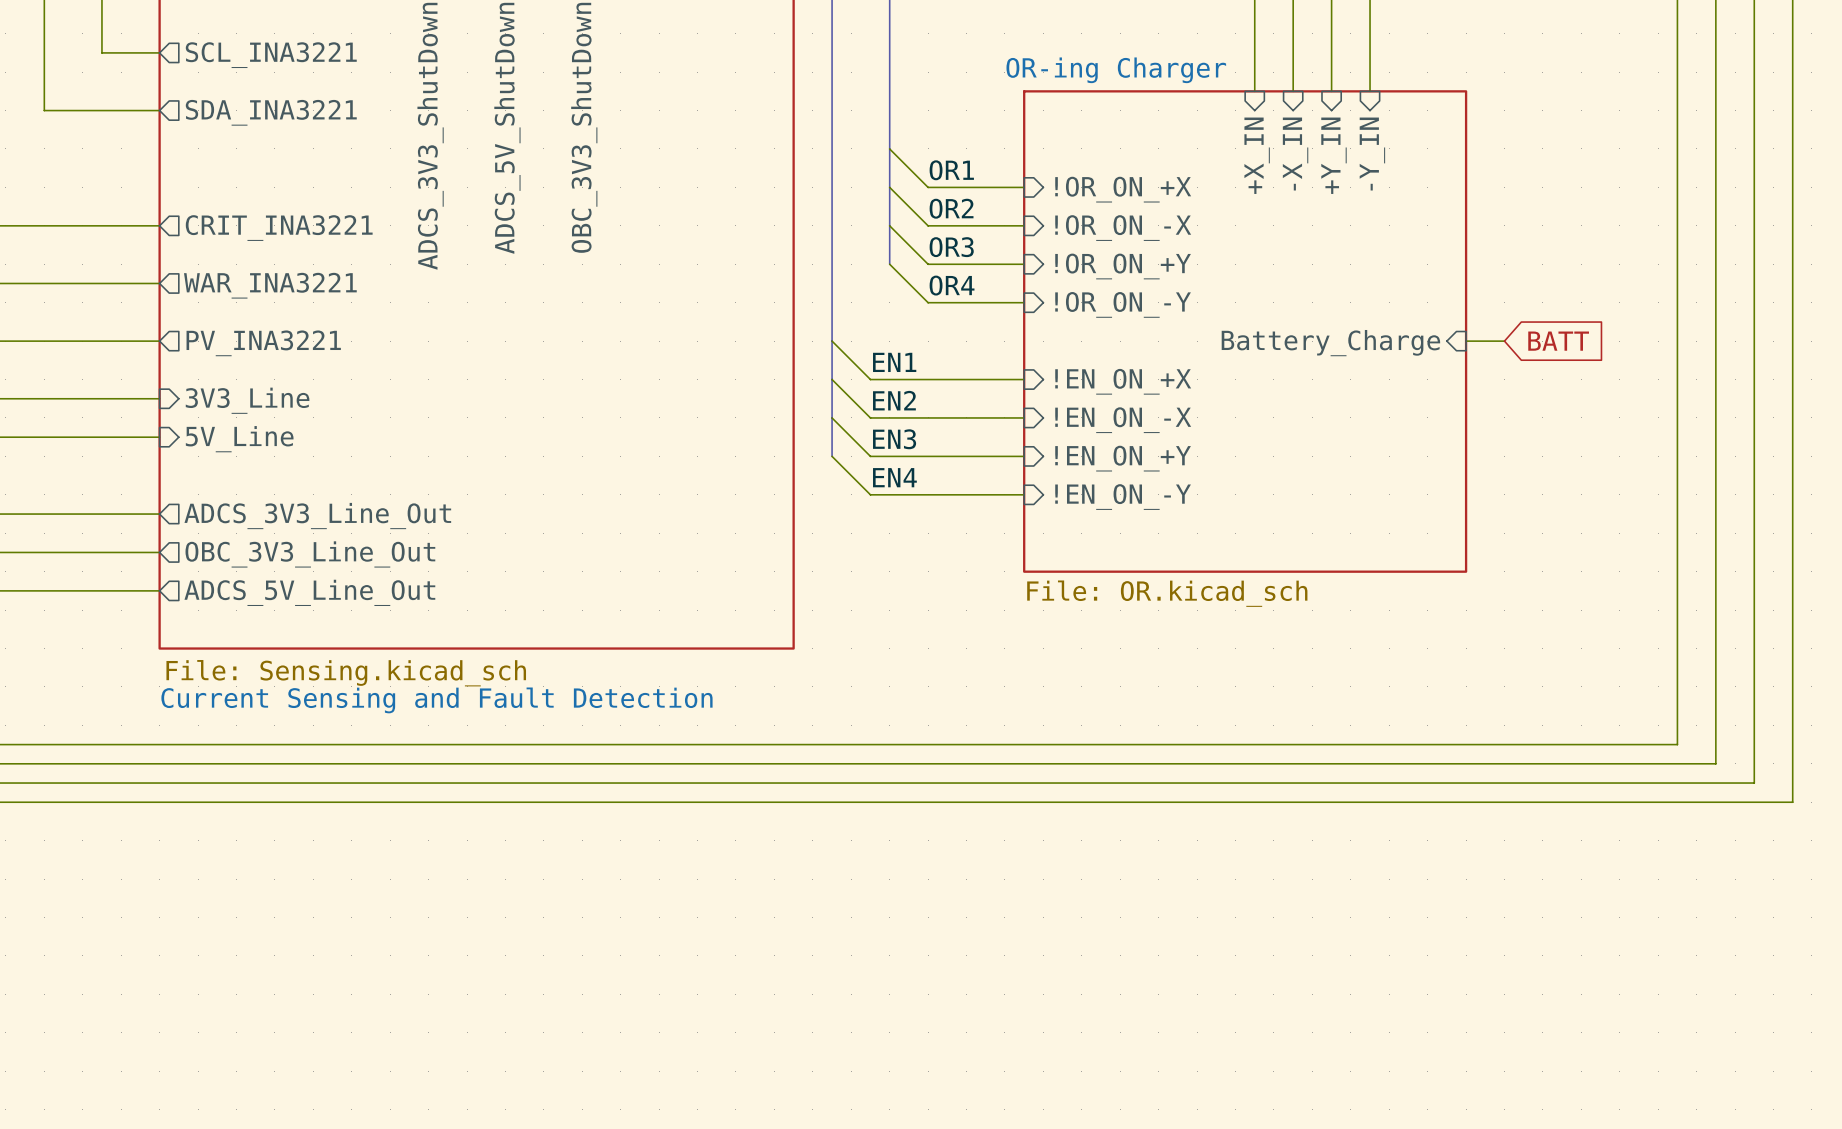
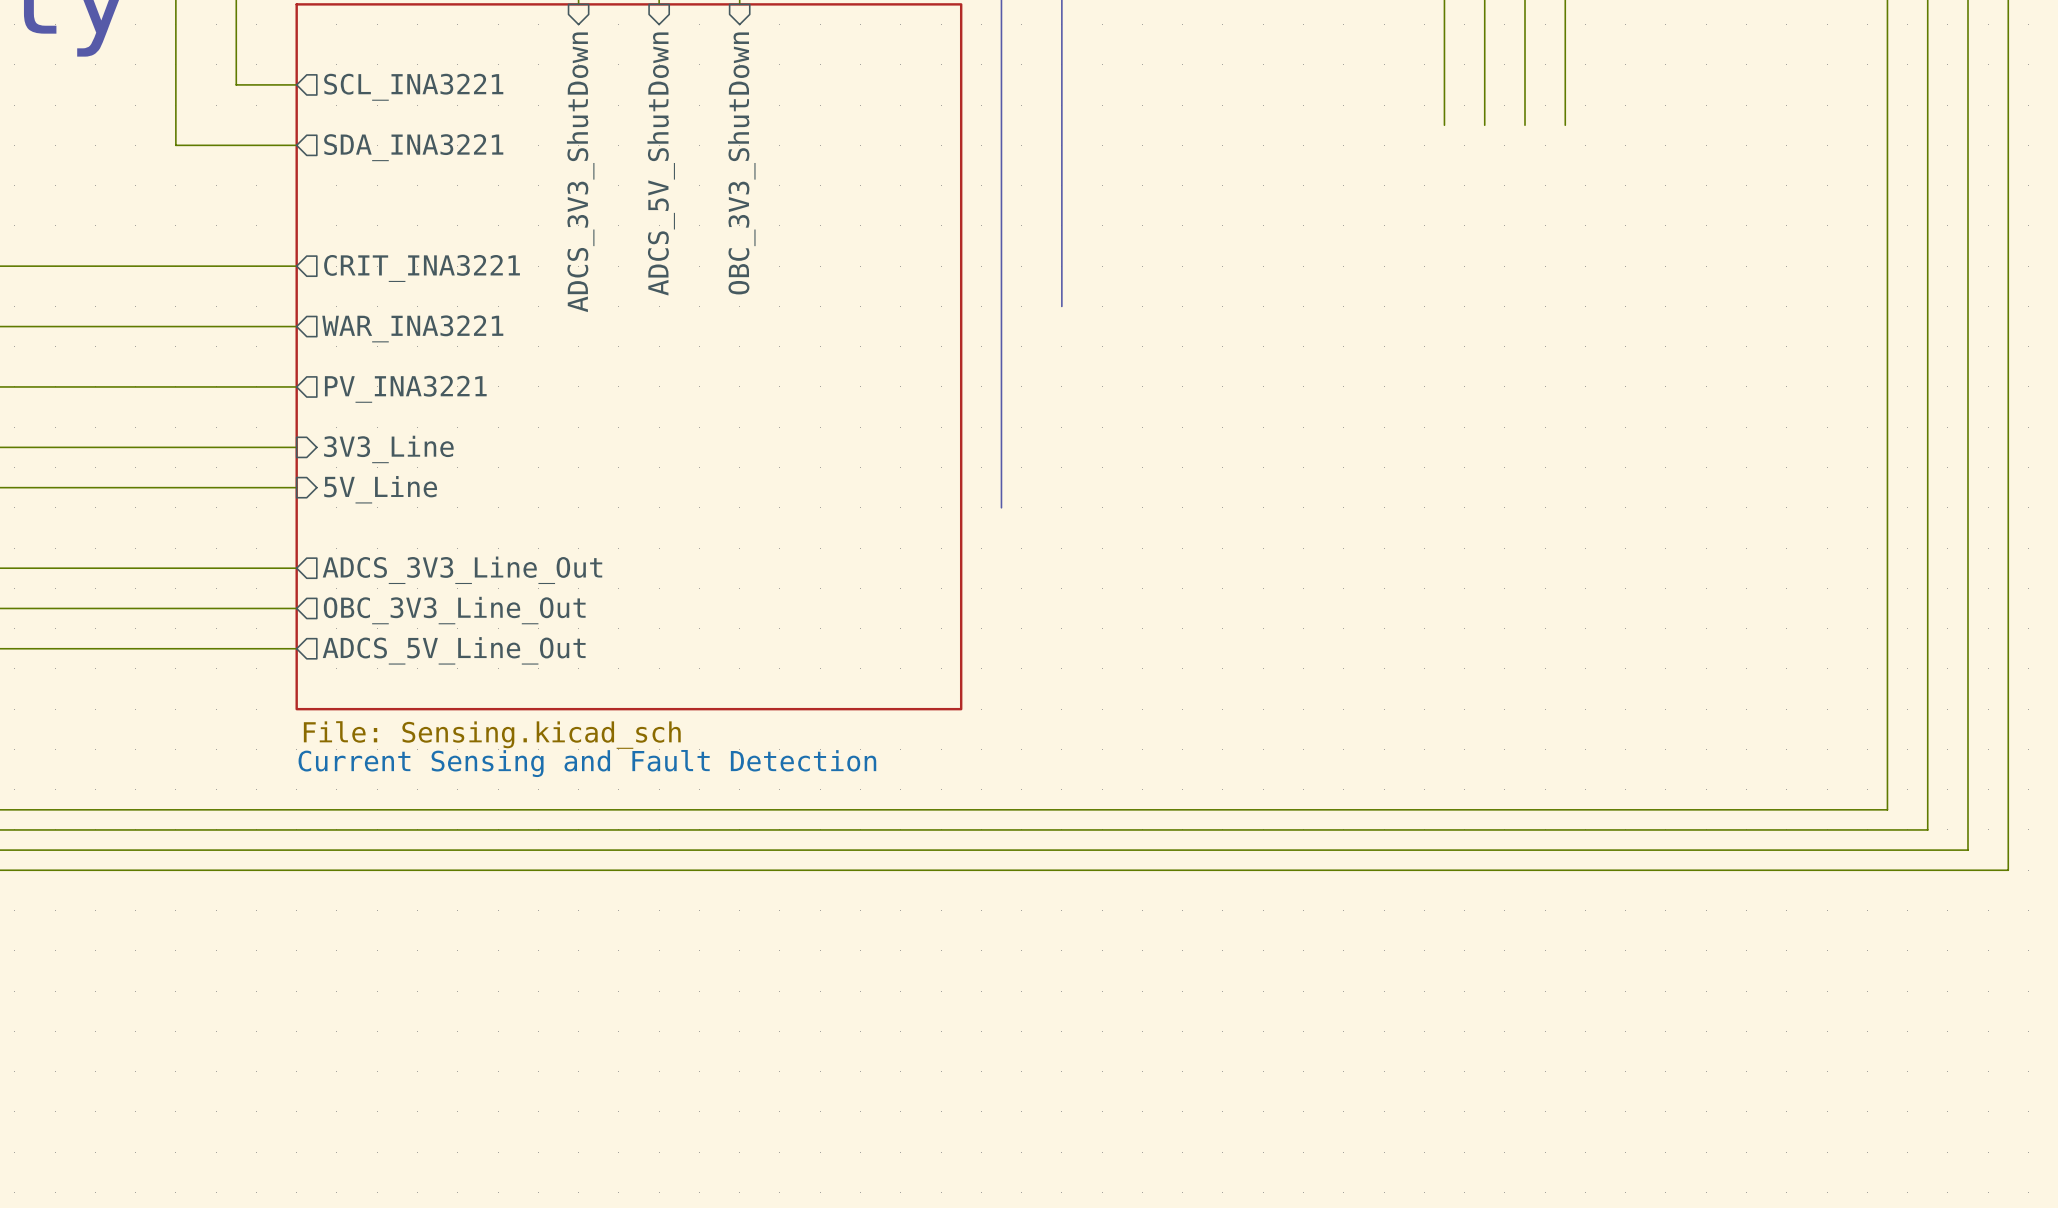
wire: (889, 148) (928, 187) (1024, 187) -> none
sheet pin: -X_IN (1295, 154) -> none
sheet pin: -Y_IN (1372, 154) -> none
sheet pin: +X_IN (1257, 155) -> none
sheet pin: +Y_IN (1333, 155) -> none
label: OR1 (951, 170) -> none
wire: (889, 187) (928, 225) (1024, 225) -> none
sheet pin: !OR_ON_+X (1123, 189) -> none
label: OR2 (951, 208) -> none
wire: (889, 225) (928, 264) (1024, 264) -> none
sheet pin: !OR_ON_-X (1123, 228) -> none
label: OR3 (951, 247) -> none
wire: (889, 264) (928, 302) (1024, 302) -> none
sheet pin: !OR_ON_+Y (1123, 266) -> none
label: OR4 (952, 285) -> none
sheet pin: !OR_ON_-Y (1123, 304) -> none
sheet OR-ing Charger: File: OR.kicad_sch (1245, 331) -> none
wire: (832, 341) (870, 379) (1024, 379) -> none
wire: (1466, 341) (1504, 341) -> none
global label: BATT (1558, 341) -> none
sheet pin: Battery_Charge (1330, 343) -> none
label: EN1 (894, 362) -> none
wire: (832, 379) (870, 417) (1024, 417) -> none
sheet pin: !EN_ON_+X (1123, 381) -> none
label: EN2 (894, 400) -> none
wire: (832, 417) (870, 456) (1024, 456) -> none
sheet pin: !EN_ON_-X (1123, 420) -> none
label: EN3 (894, 439) -> none
wire: (832, 456) (870, 494) (1024, 494) -> none
sheet pin: !EN_ON_+Y (1123, 458) -> none
label: EN4 (894, 477) -> none
sheet pin: !EN_ON_-Y (1123, 497) -> none

